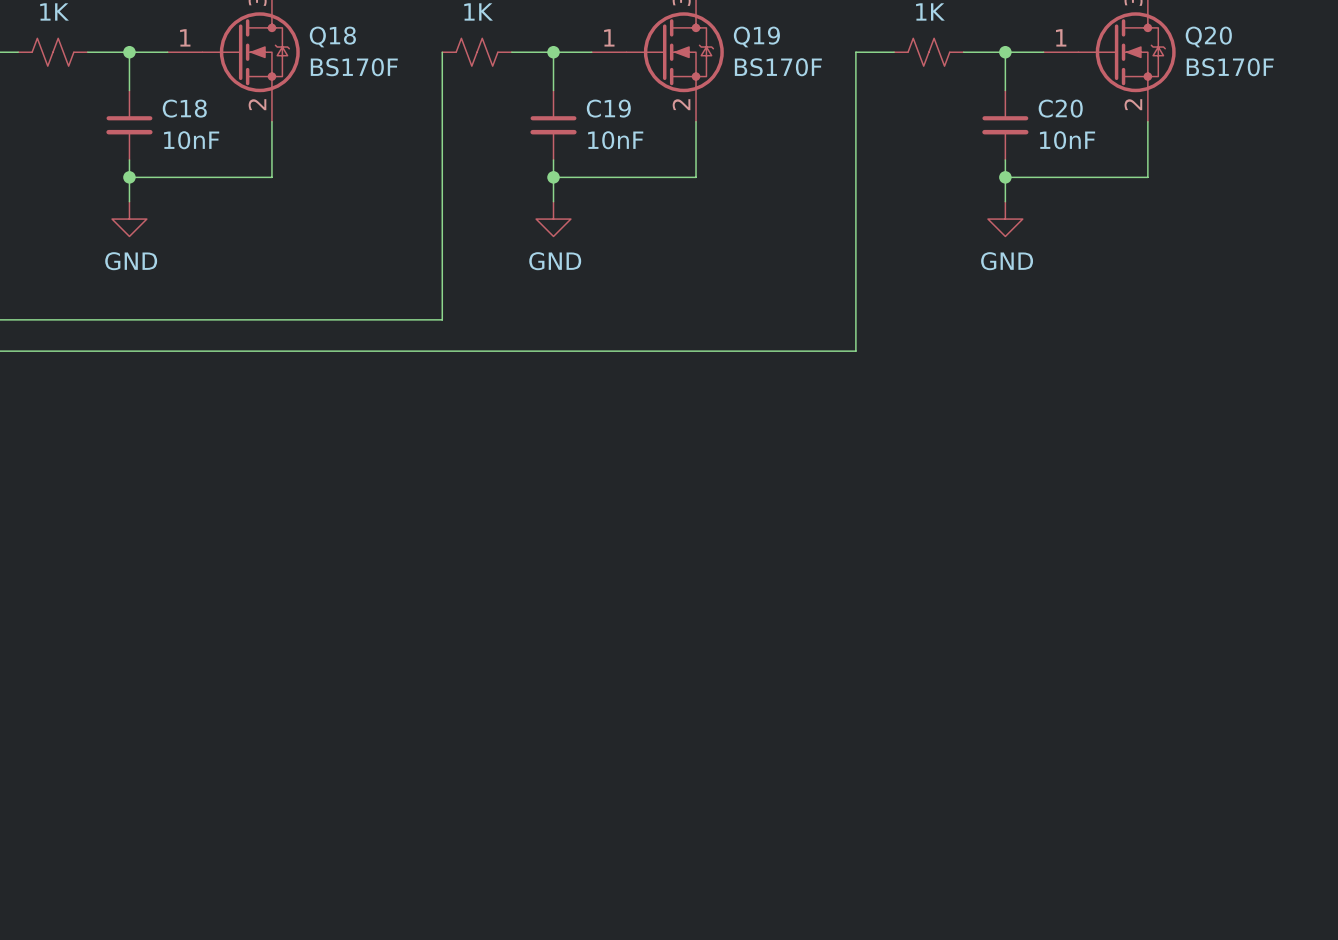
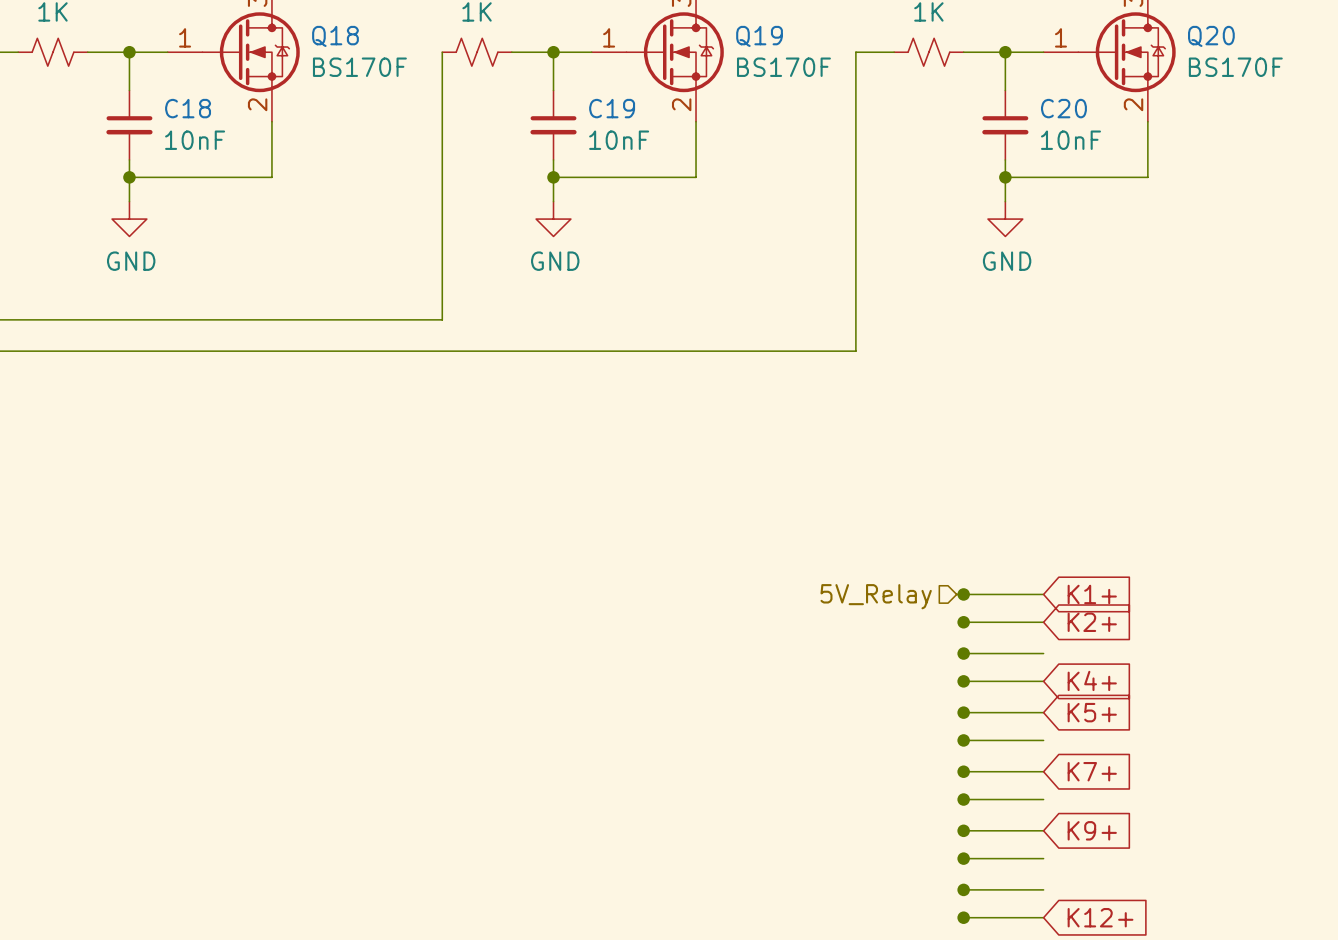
wire: none -> (956, 594) (1043, 594)
junction: none -> (963, 594)
global label: none -> K1+ (1092, 594)
hierarchical label: none -> 5V_Relay (876, 596)
wire: none -> (963, 622) (1043, 622)
junction: none -> (963, 622)
global label: none -> K2+ (1092, 622)
wire: none -> (963, 653) (1043, 653)
junction: none -> (963, 653)
wire: none -> (963, 681) (1043, 681)
junction: none -> (963, 681)
global label: none -> K4+ (1092, 680)
wire: none -> (963, 712) (1043, 712)
junction: none -> (963, 712)
global label: none -> K5+ (1092, 712)
wire: none -> (963, 740) (1043, 740)
junction: none -> (963, 740)
wire: none -> (963, 771) (1043, 771)
junction: none -> (963, 771)
global label: none -> K7+ (1092, 771)
wire: none -> (963, 799) (1043, 799)
junction: none -> (963, 799)
wire: none -> (963, 830) (1043, 830)
junction: none -> (963, 830)
global label: none -> K9+ (1092, 830)
wire: none -> (963, 858) (1043, 858)
junction: none -> (963, 858)
wire: none -> (963, 889) (1043, 889)
junction: none -> (963, 889)
wire: none -> (963, 917) (1043, 917)
junction: none -> (963, 917)
global label: none -> K12+ (1100, 917)

